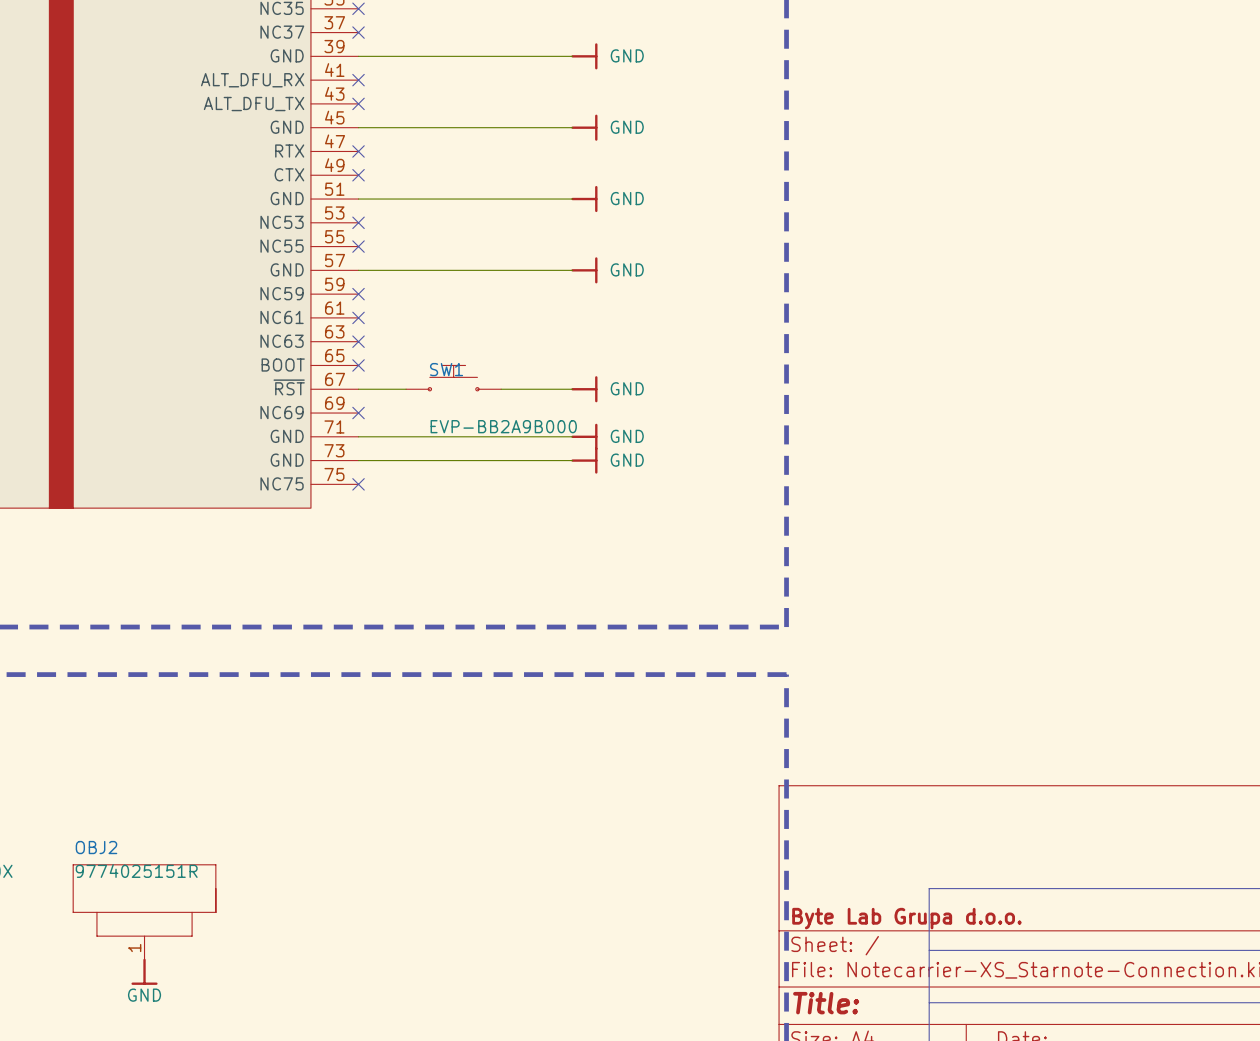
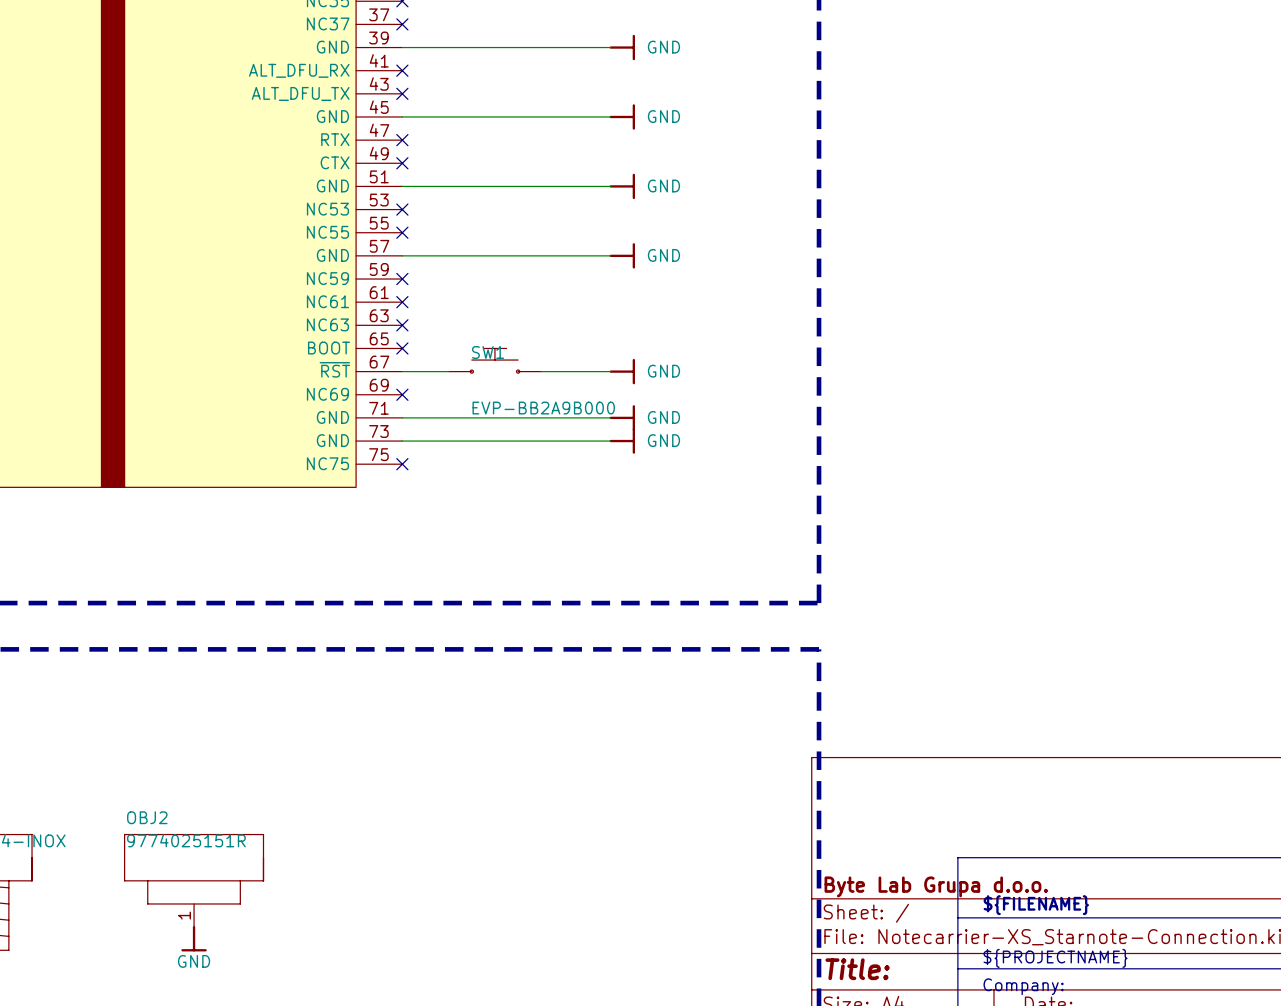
text: none -> ${FILENAME} (1036, 905)
text: none -> ${PROJECTNAME} (1055, 958)
text: none -> Company: (1023, 986)

